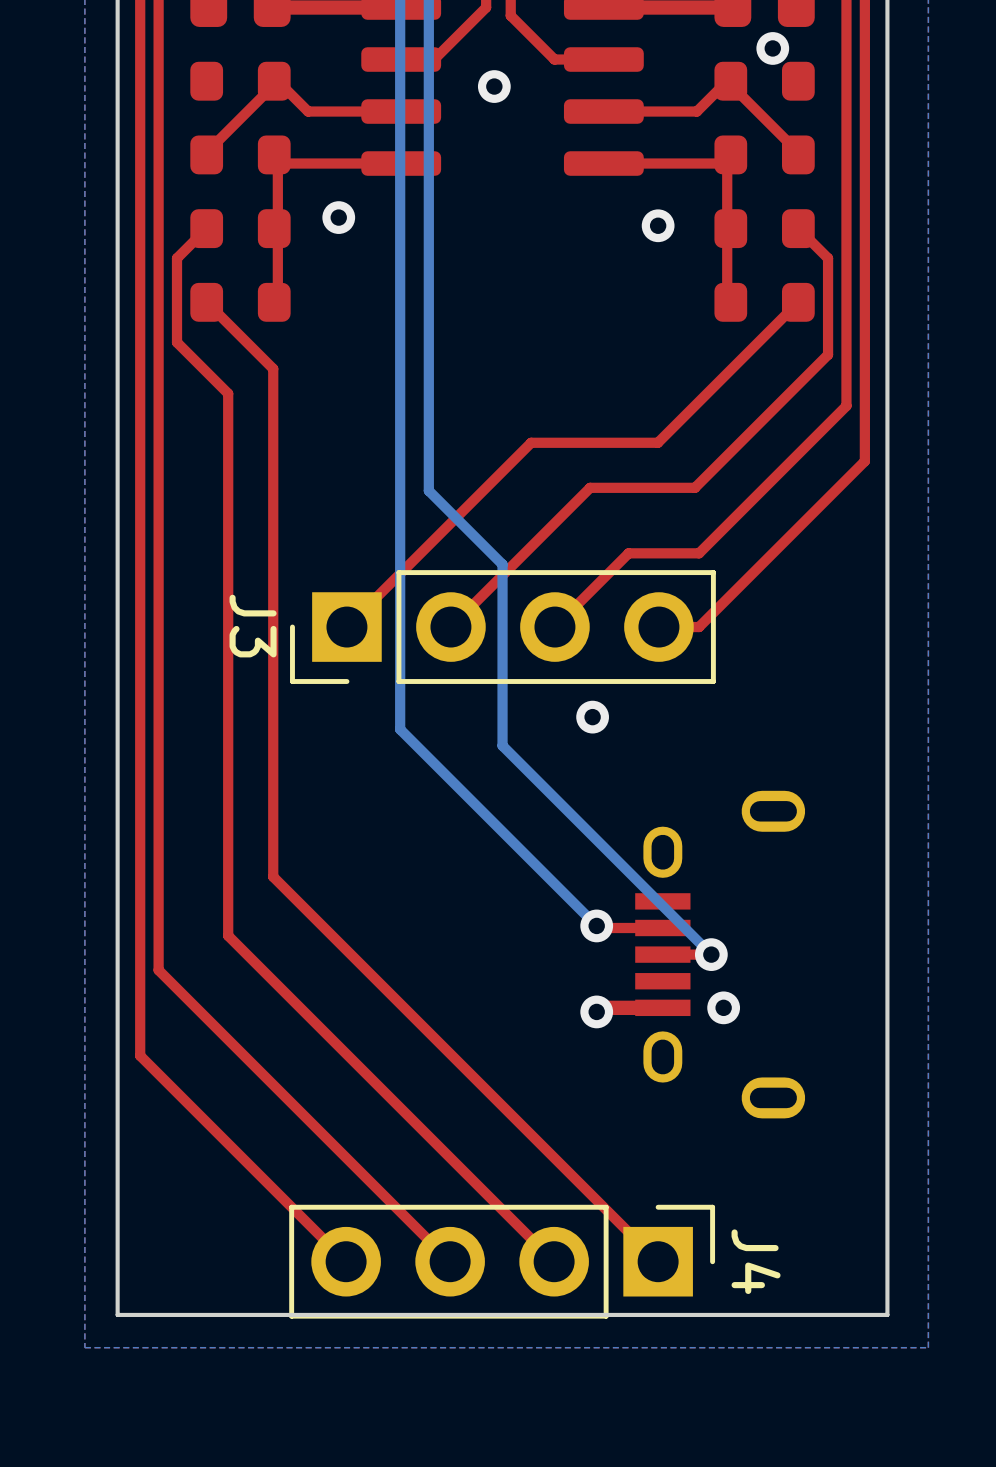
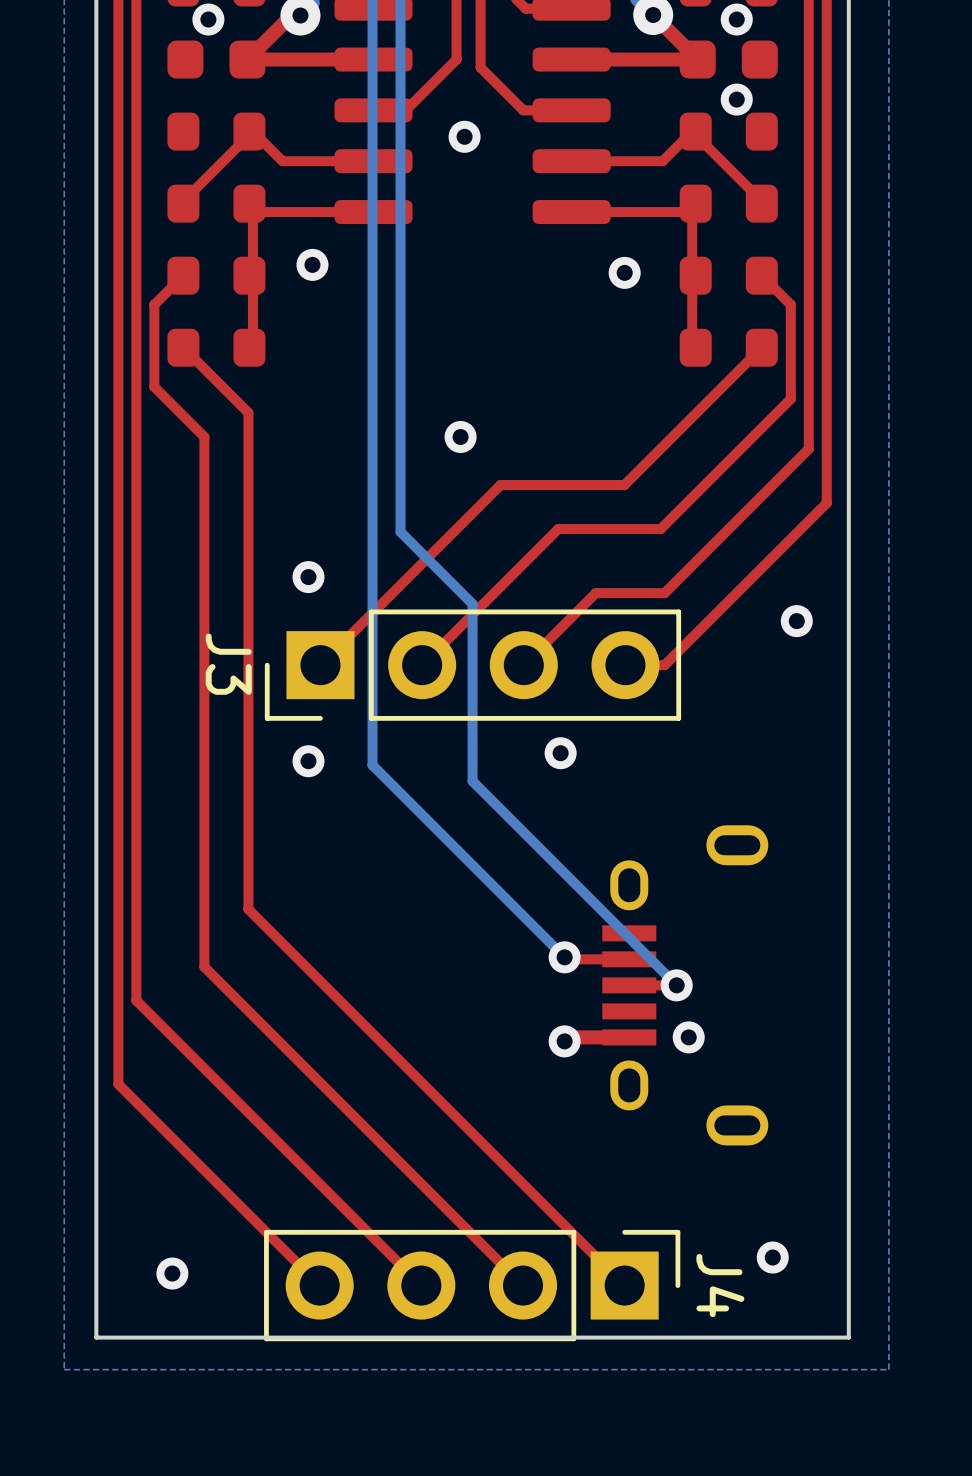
via: none -> (460, 436)
via: none -> (308, 577)
via: none -> (796, 621)
via: none -> (308, 761)
via: none -> (772, 1257)
via: none -> (172, 1273)

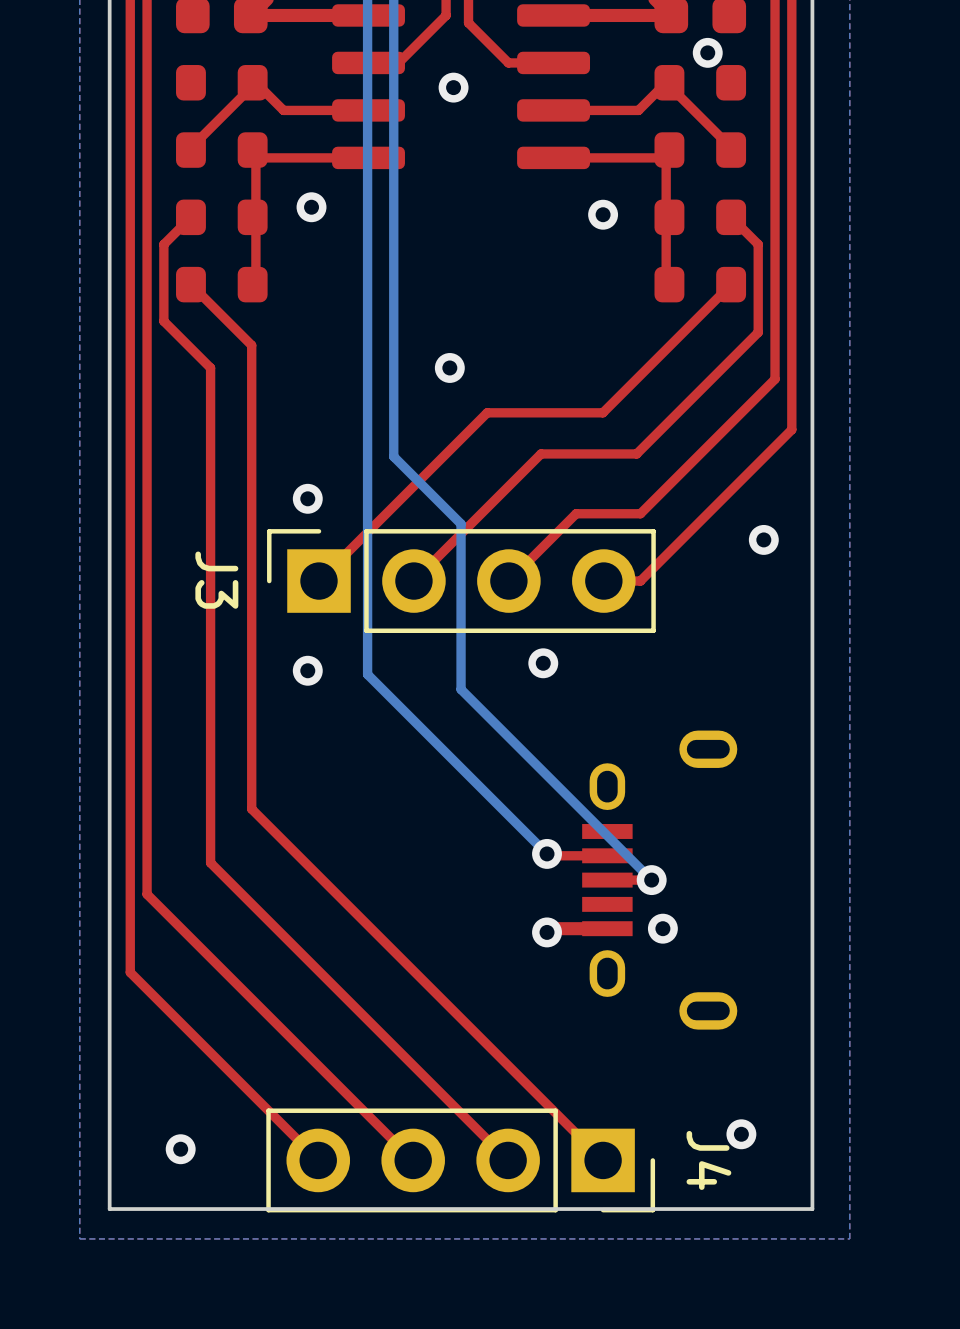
J3 footprint: [264, 609, 682, 721] -> [267, 529, 656, 634]
J4 footprint: [264, 1229, 681, 1342] -> [266, 1108, 656, 1213]

